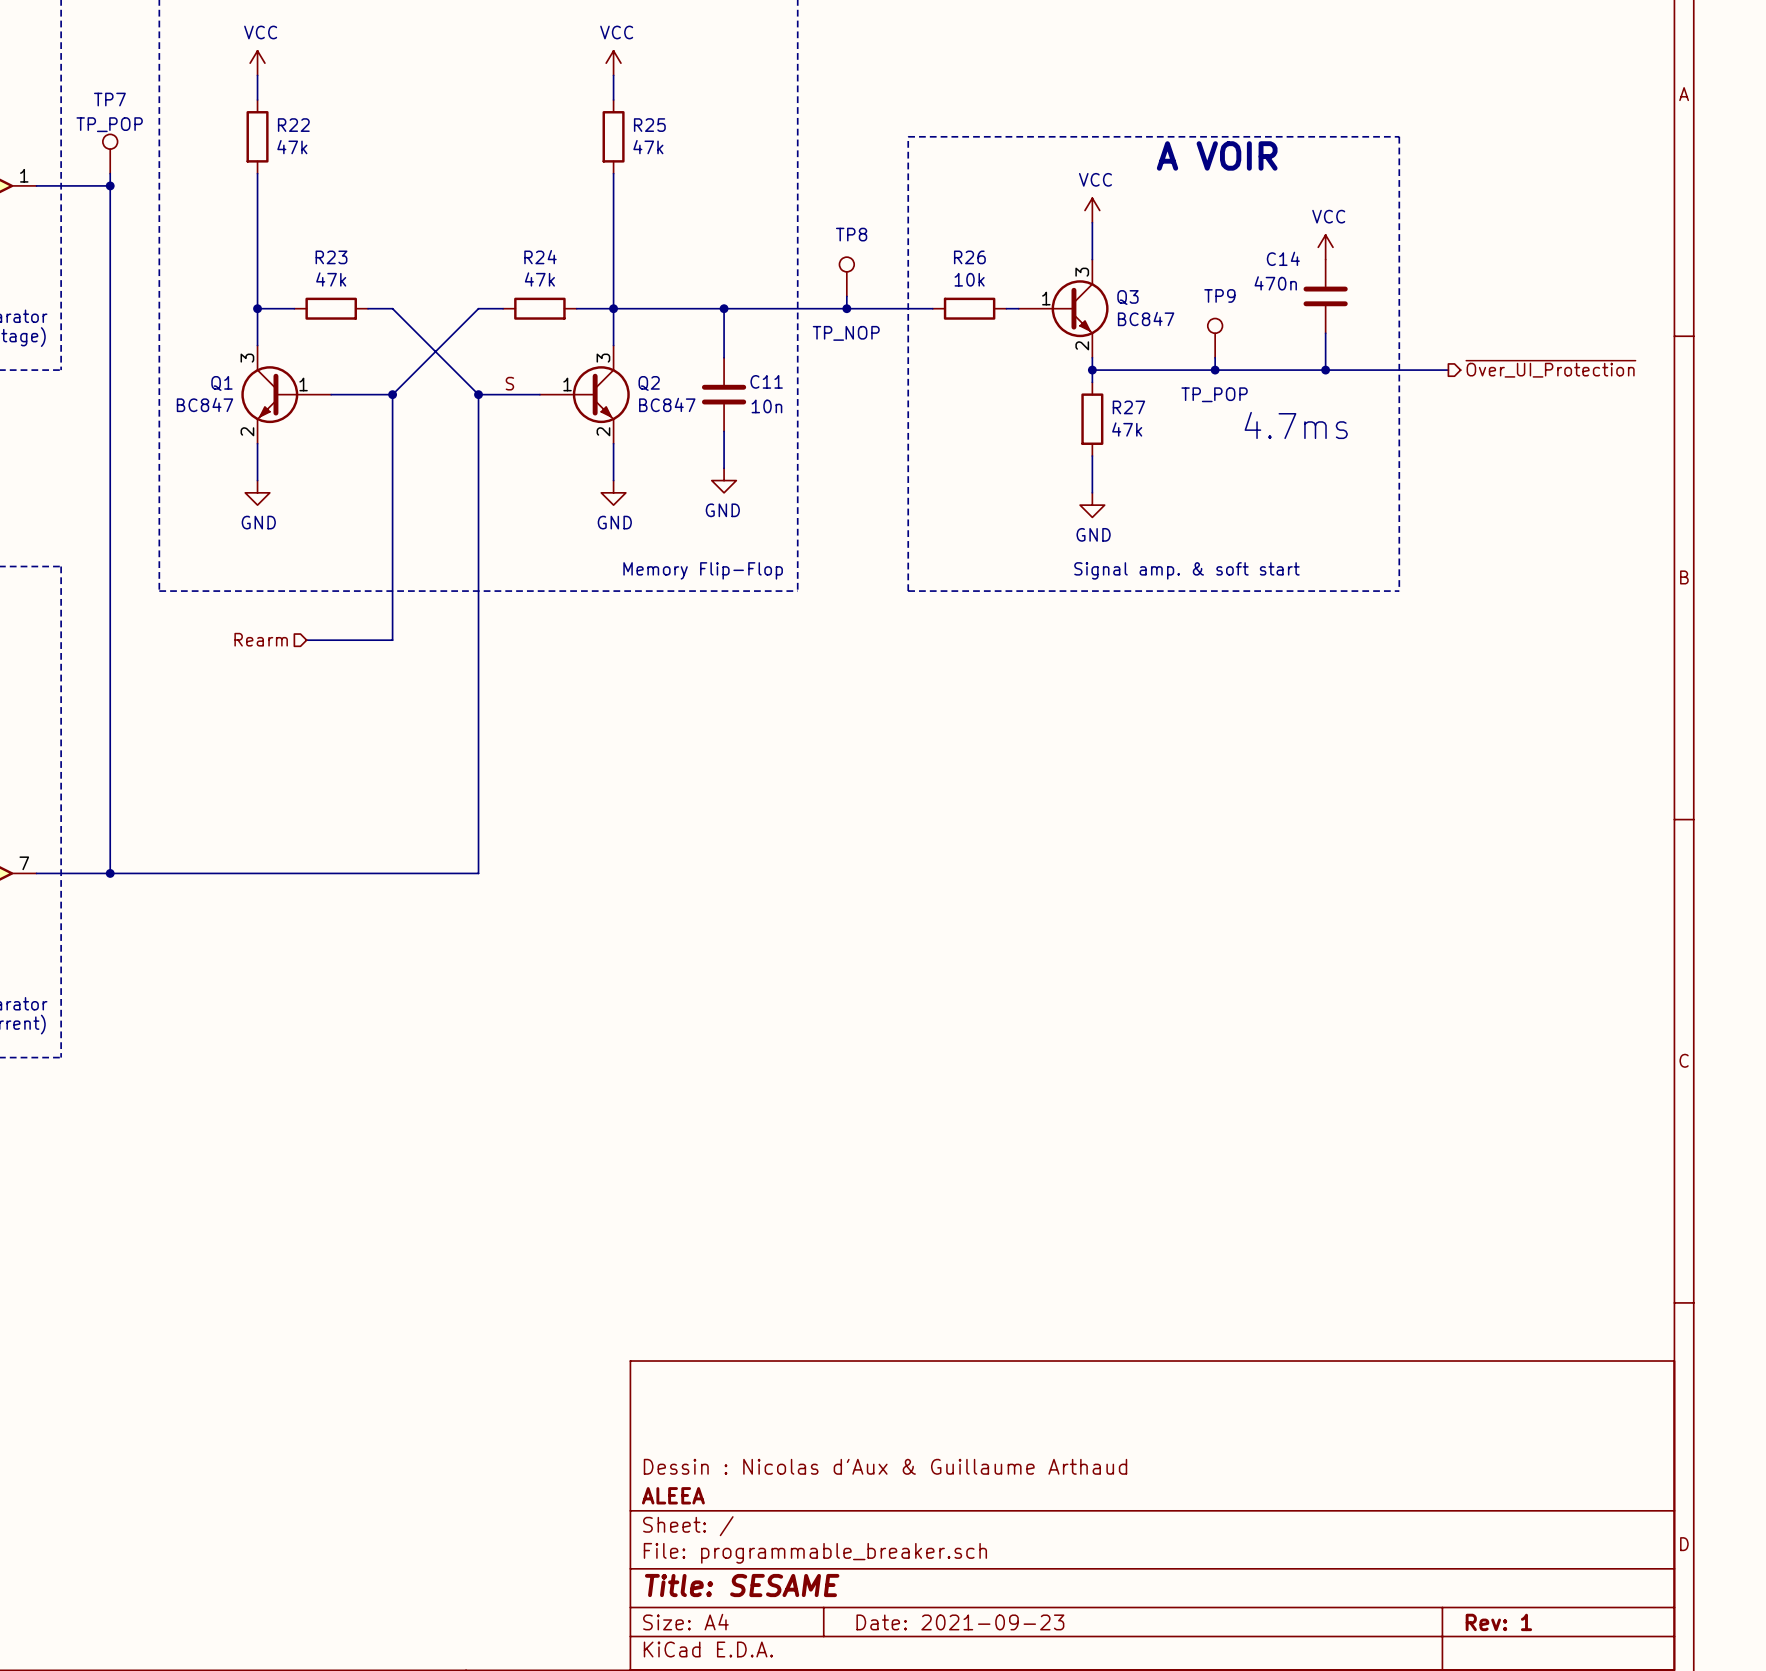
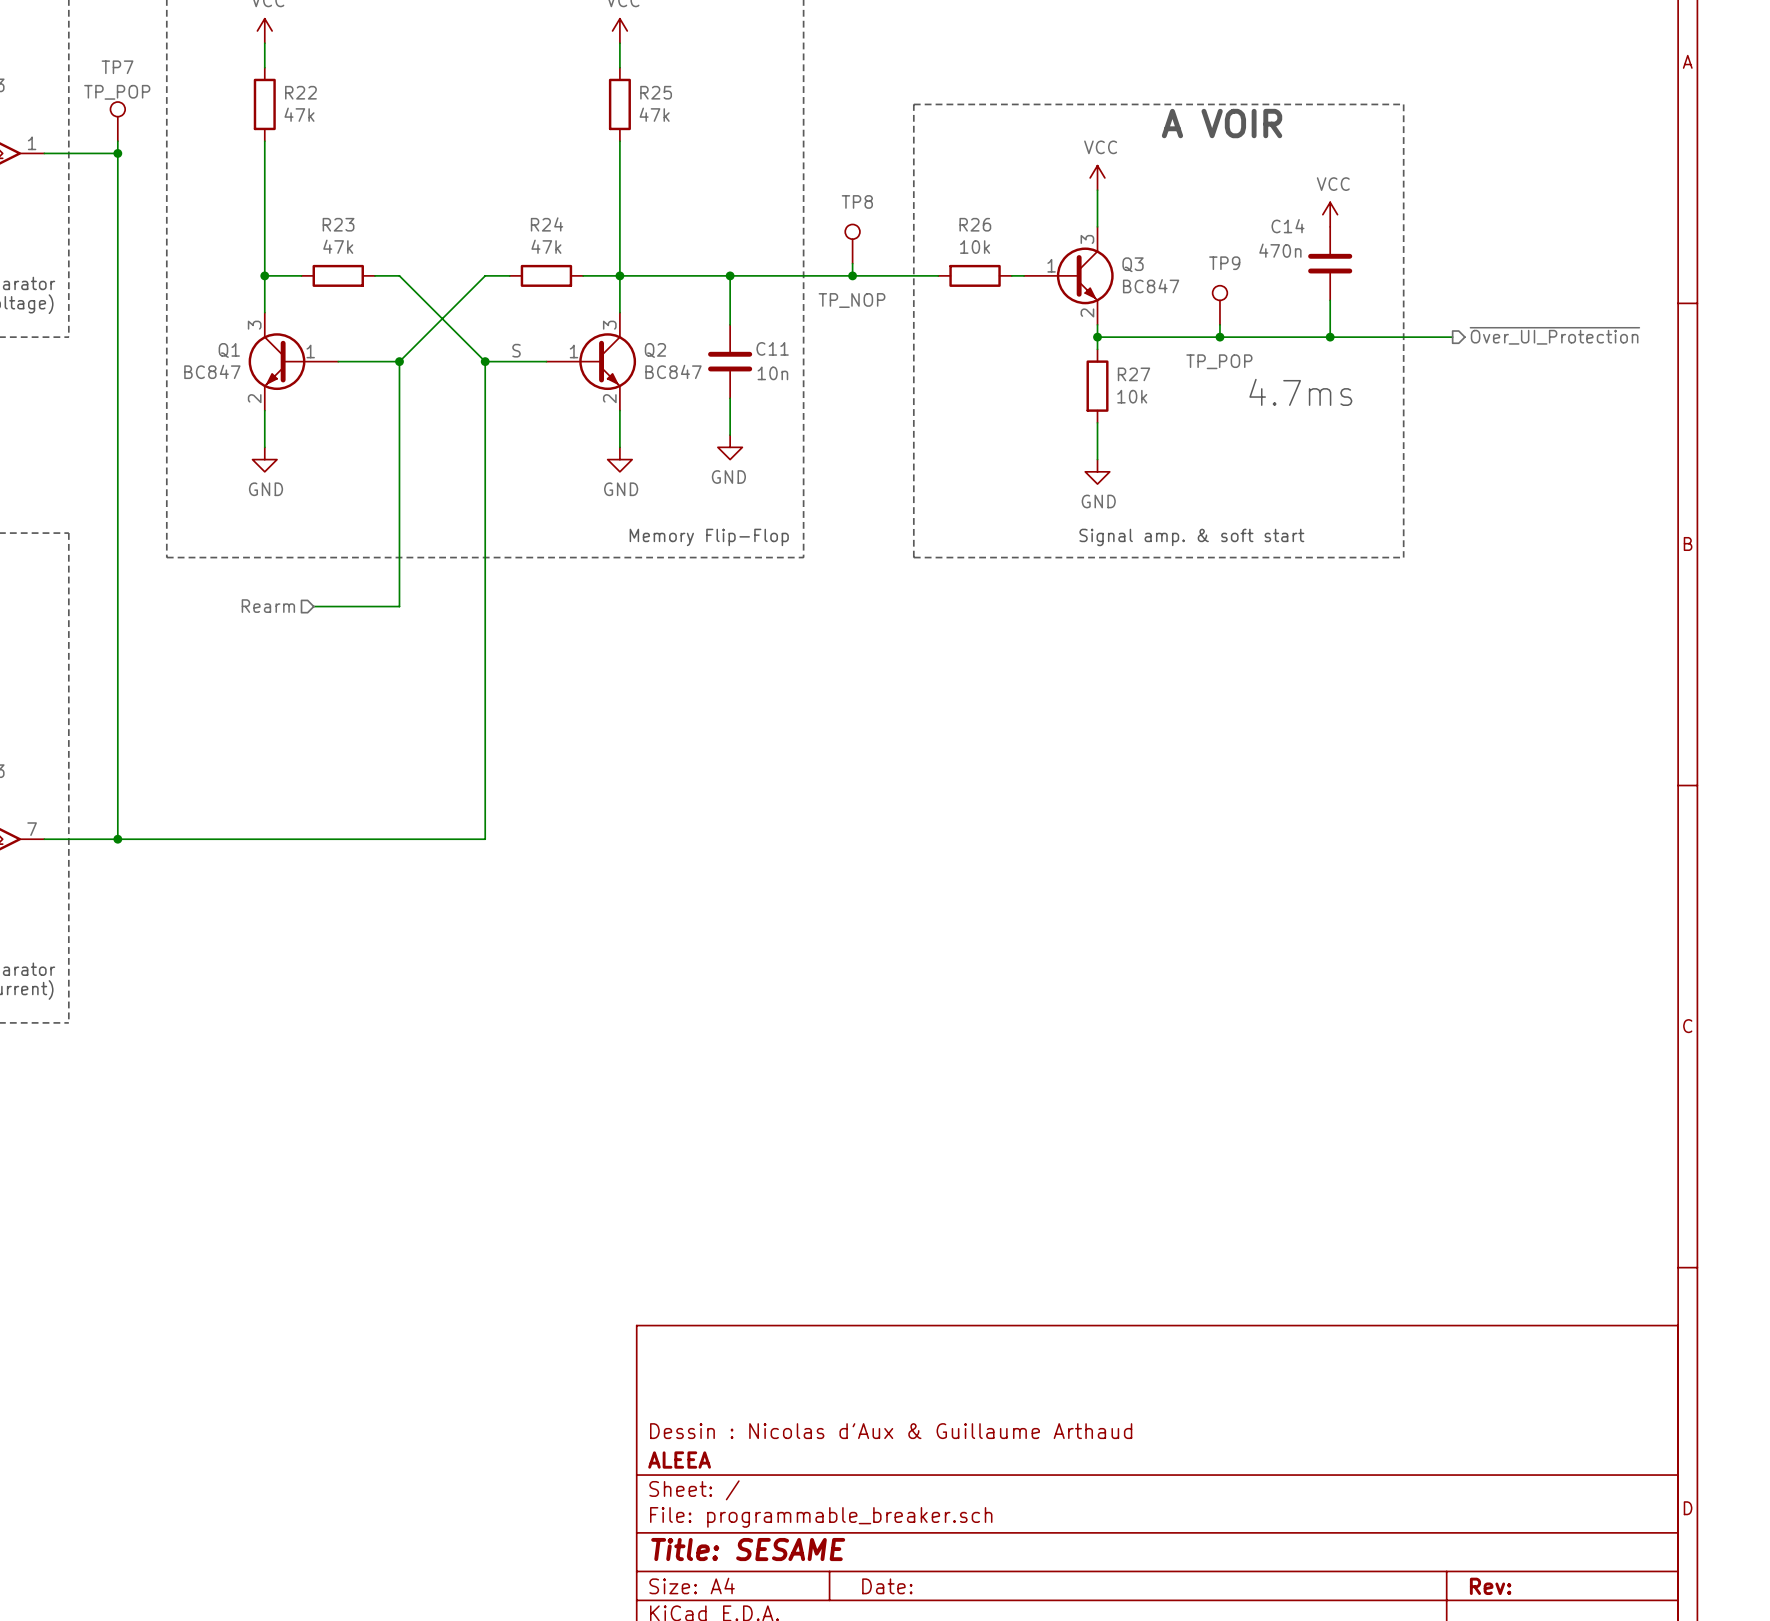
R27 value: 47k (1127, 429) -> 10k (1132, 396)
title block: Date: 2021-09-23 (960, 1622) -> Date: (887, 1586)
title block: Rev: 1 (1498, 1622) -> Rev: (1490, 1586)

